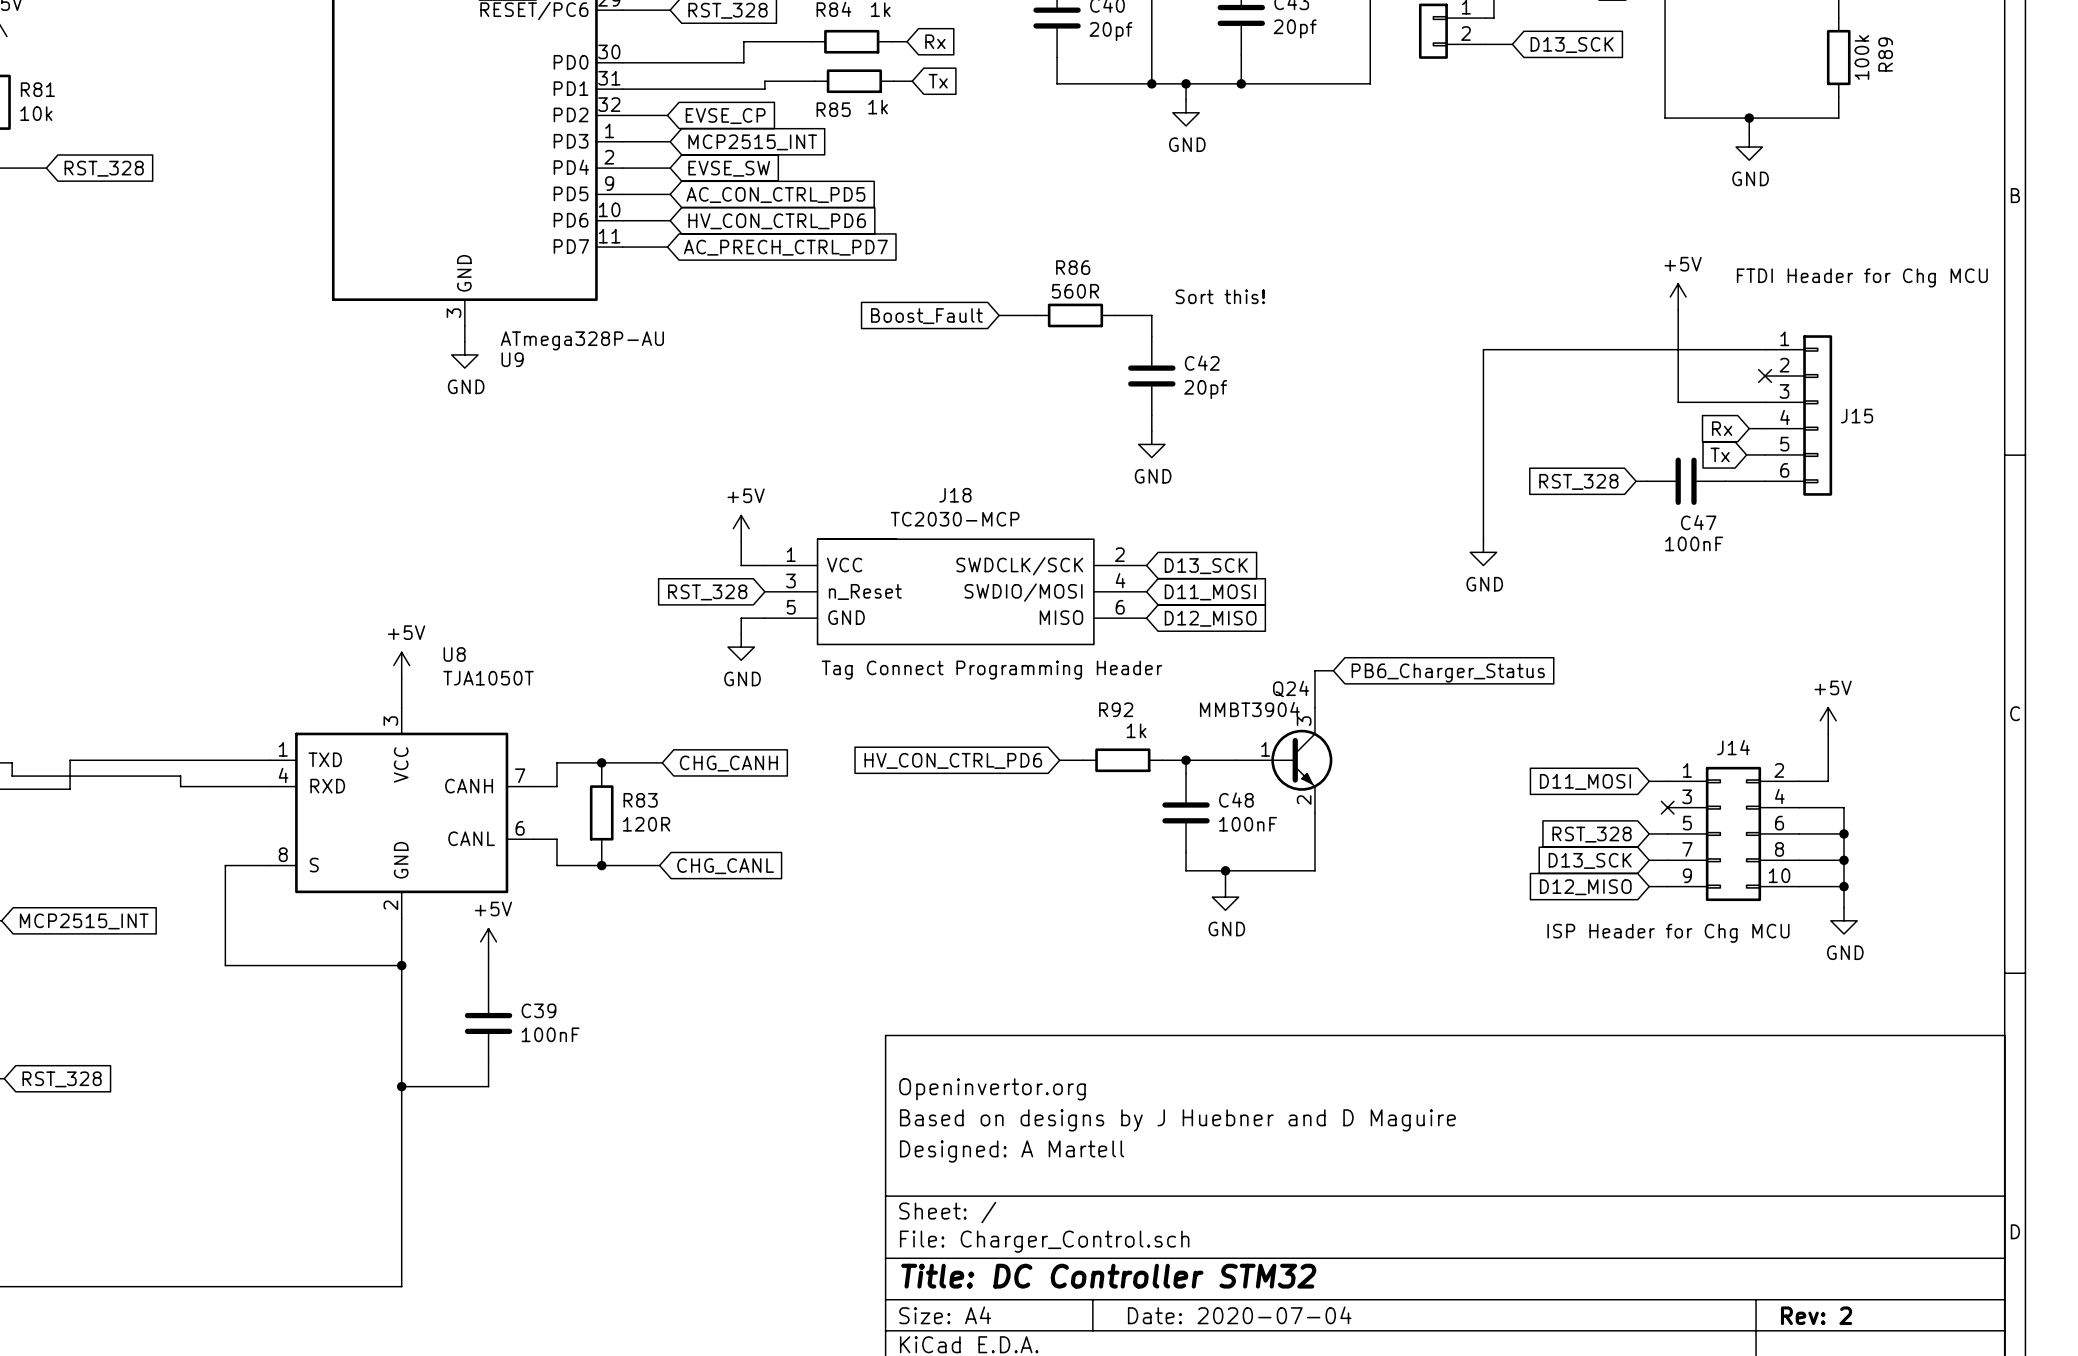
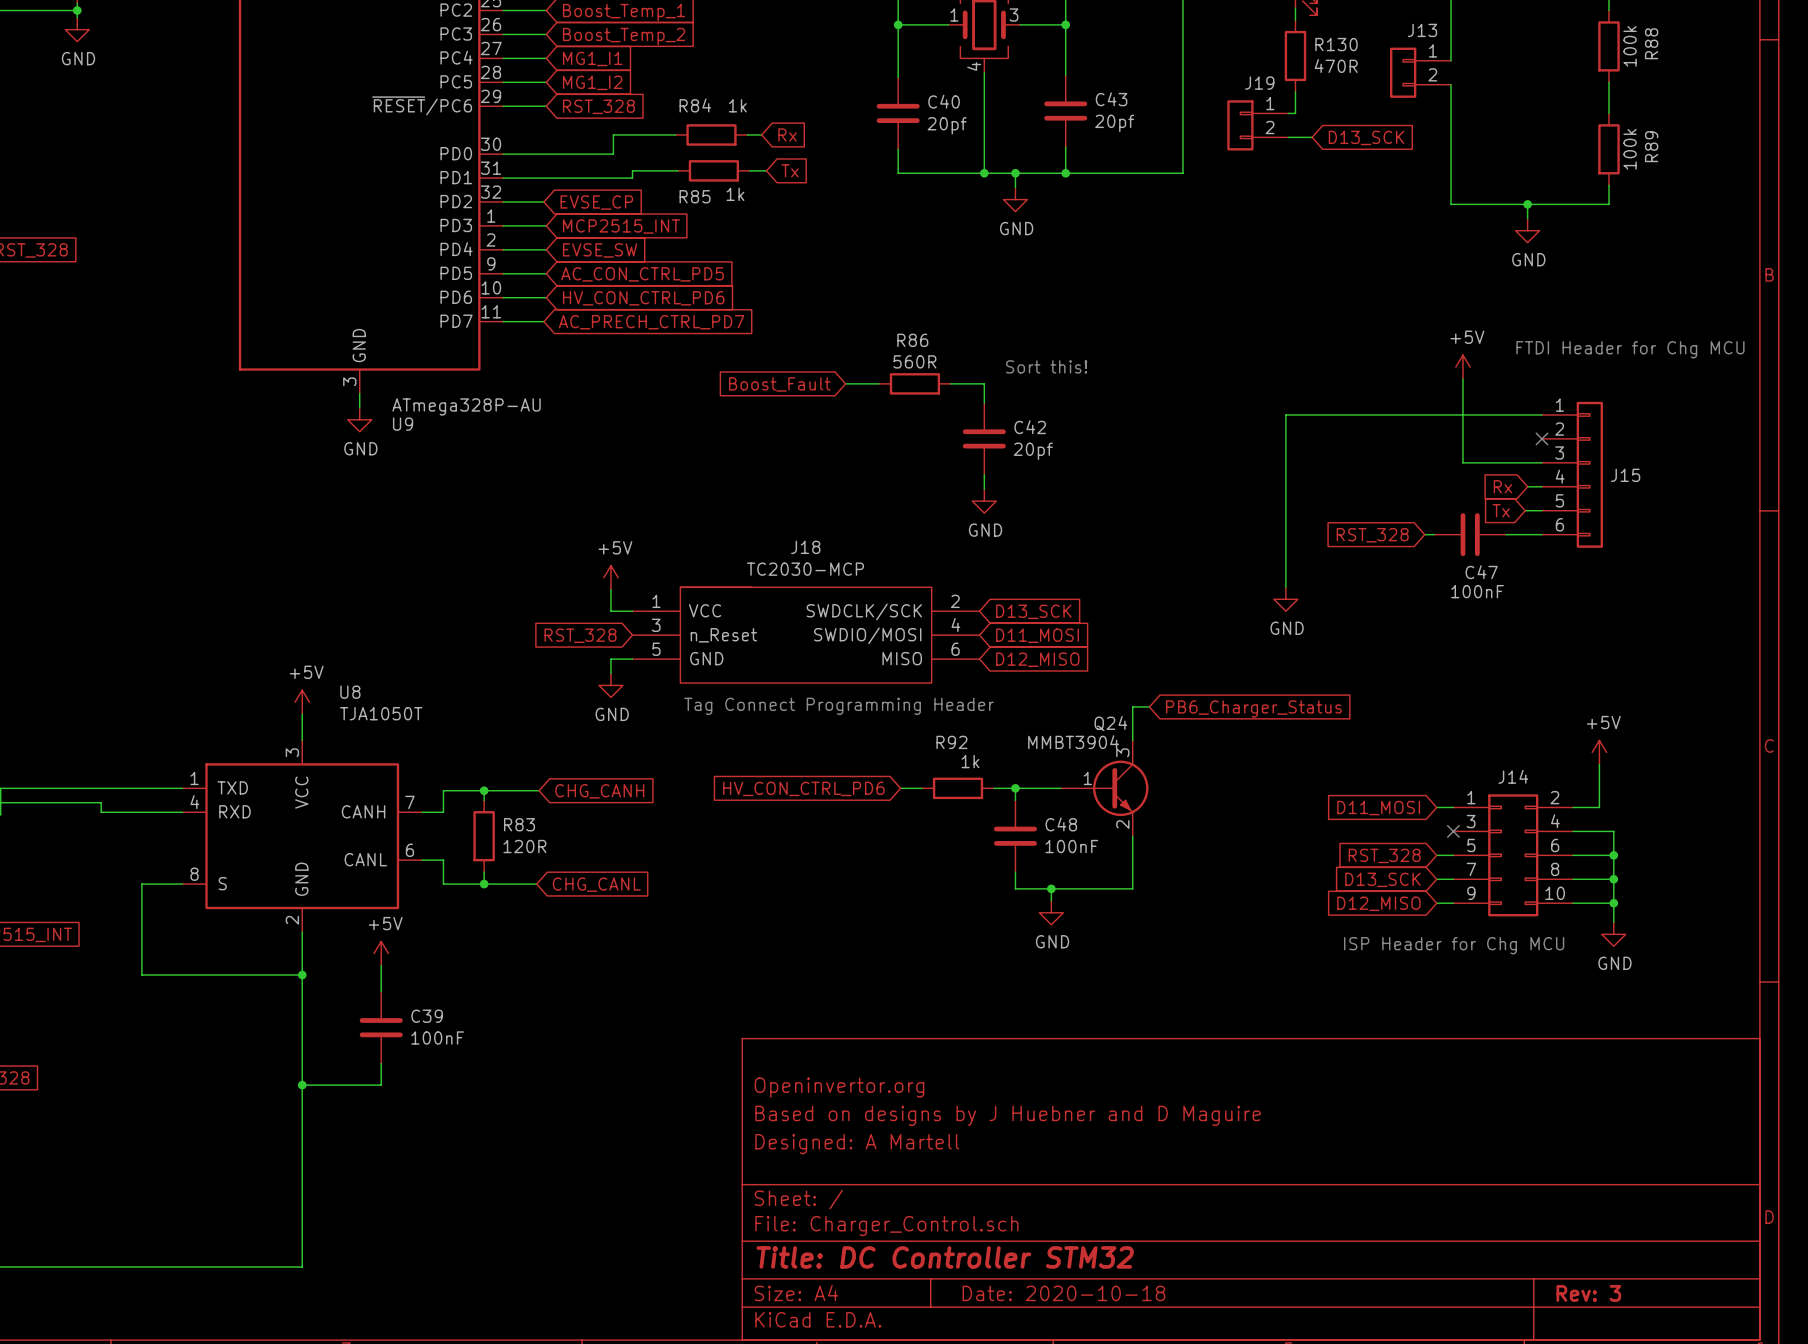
title block: Date: 2020-07-04 (1239, 1315) -> Date: 2020-10-18 (1063, 1293)
title block: Rev: 2 (1816, 1315) -> Rev: 3 (1588, 1293)

